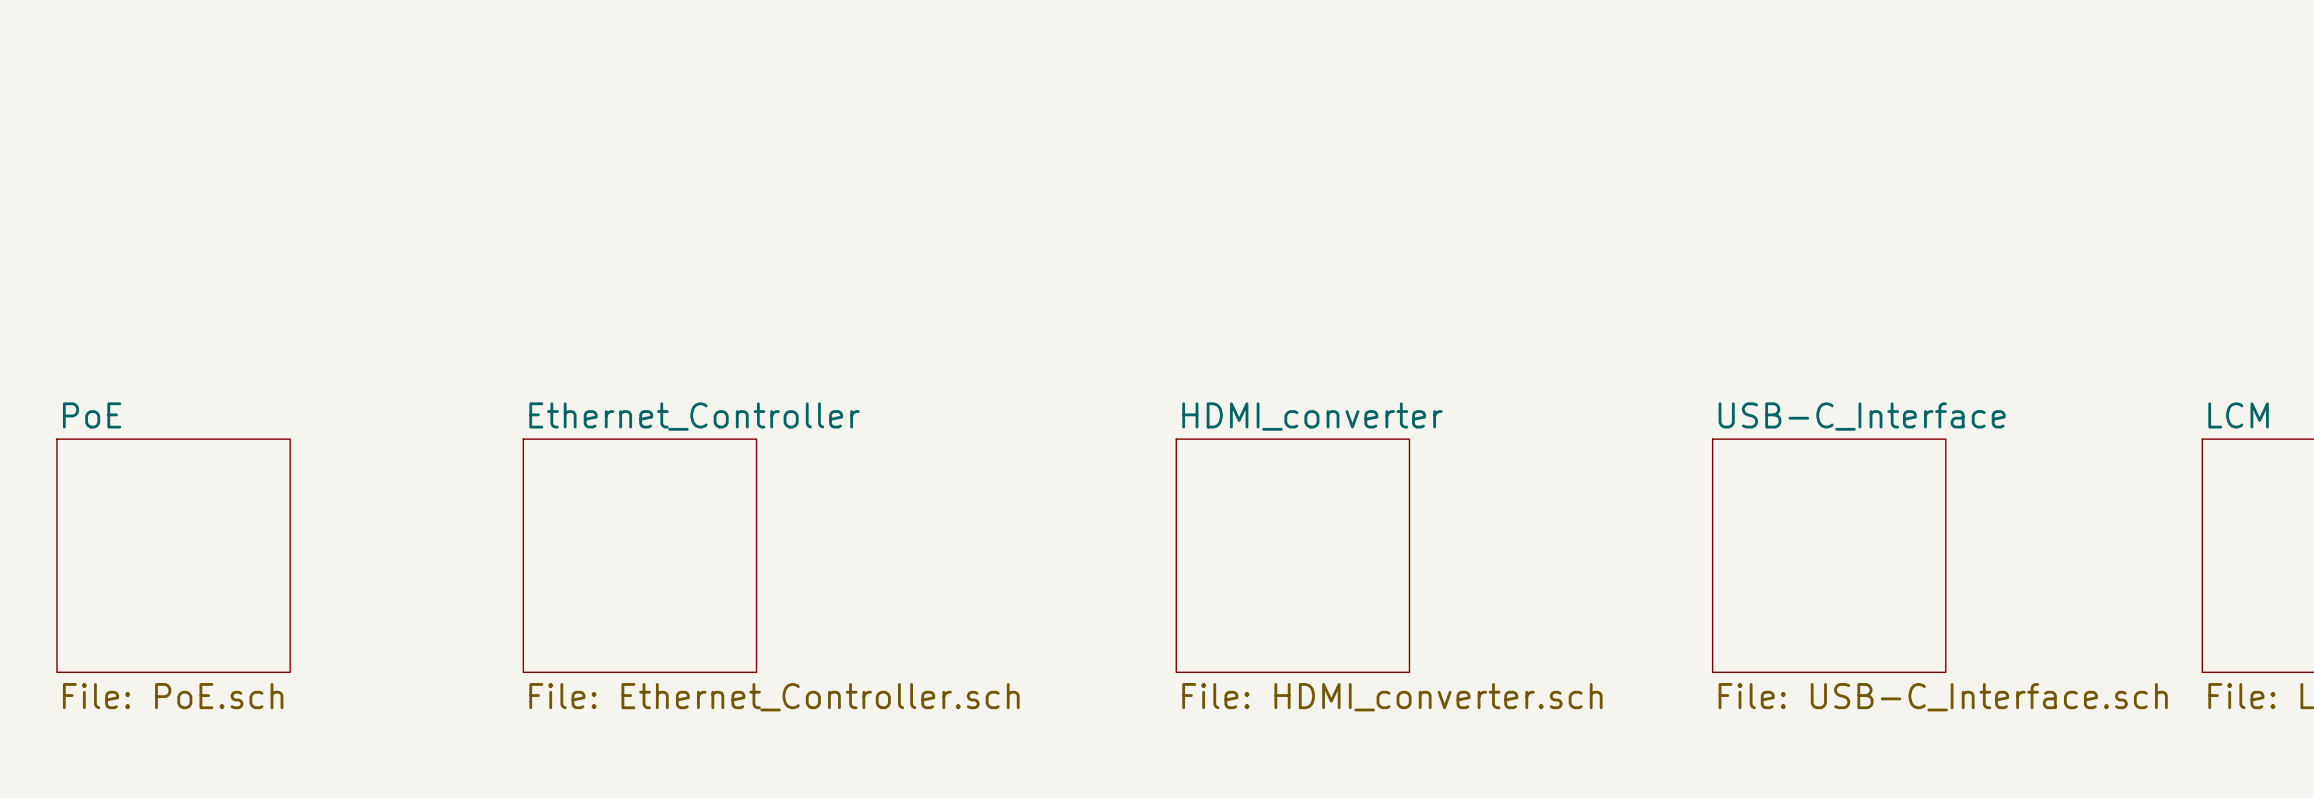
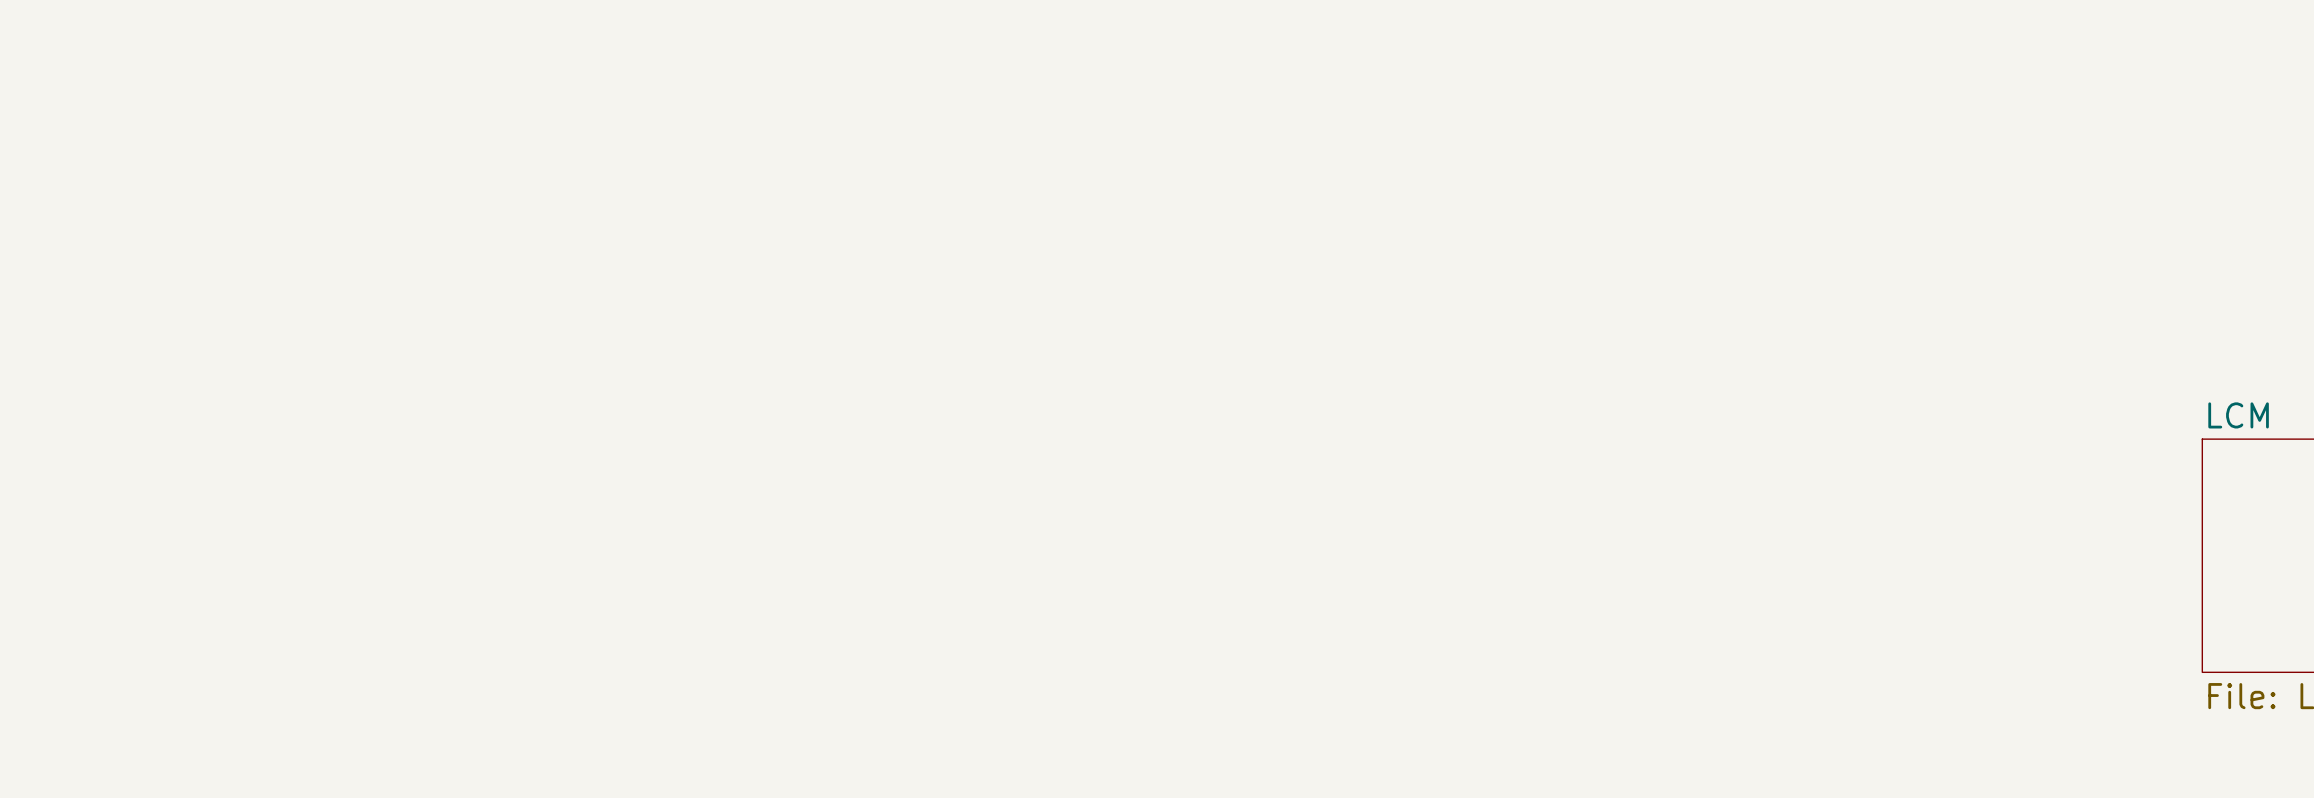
sheet PoE: File: PoE.sch (173, 555) -> none
sheet Ethernet_Controller: File: Ethernet_Controller.sch (639, 555) -> none
sheet HDMI_converter: File: HDMI_converter.sch (1292, 555) -> none
sheet USB-C_Interface: File: USB-C_Interface.sch (1829, 555) -> none

